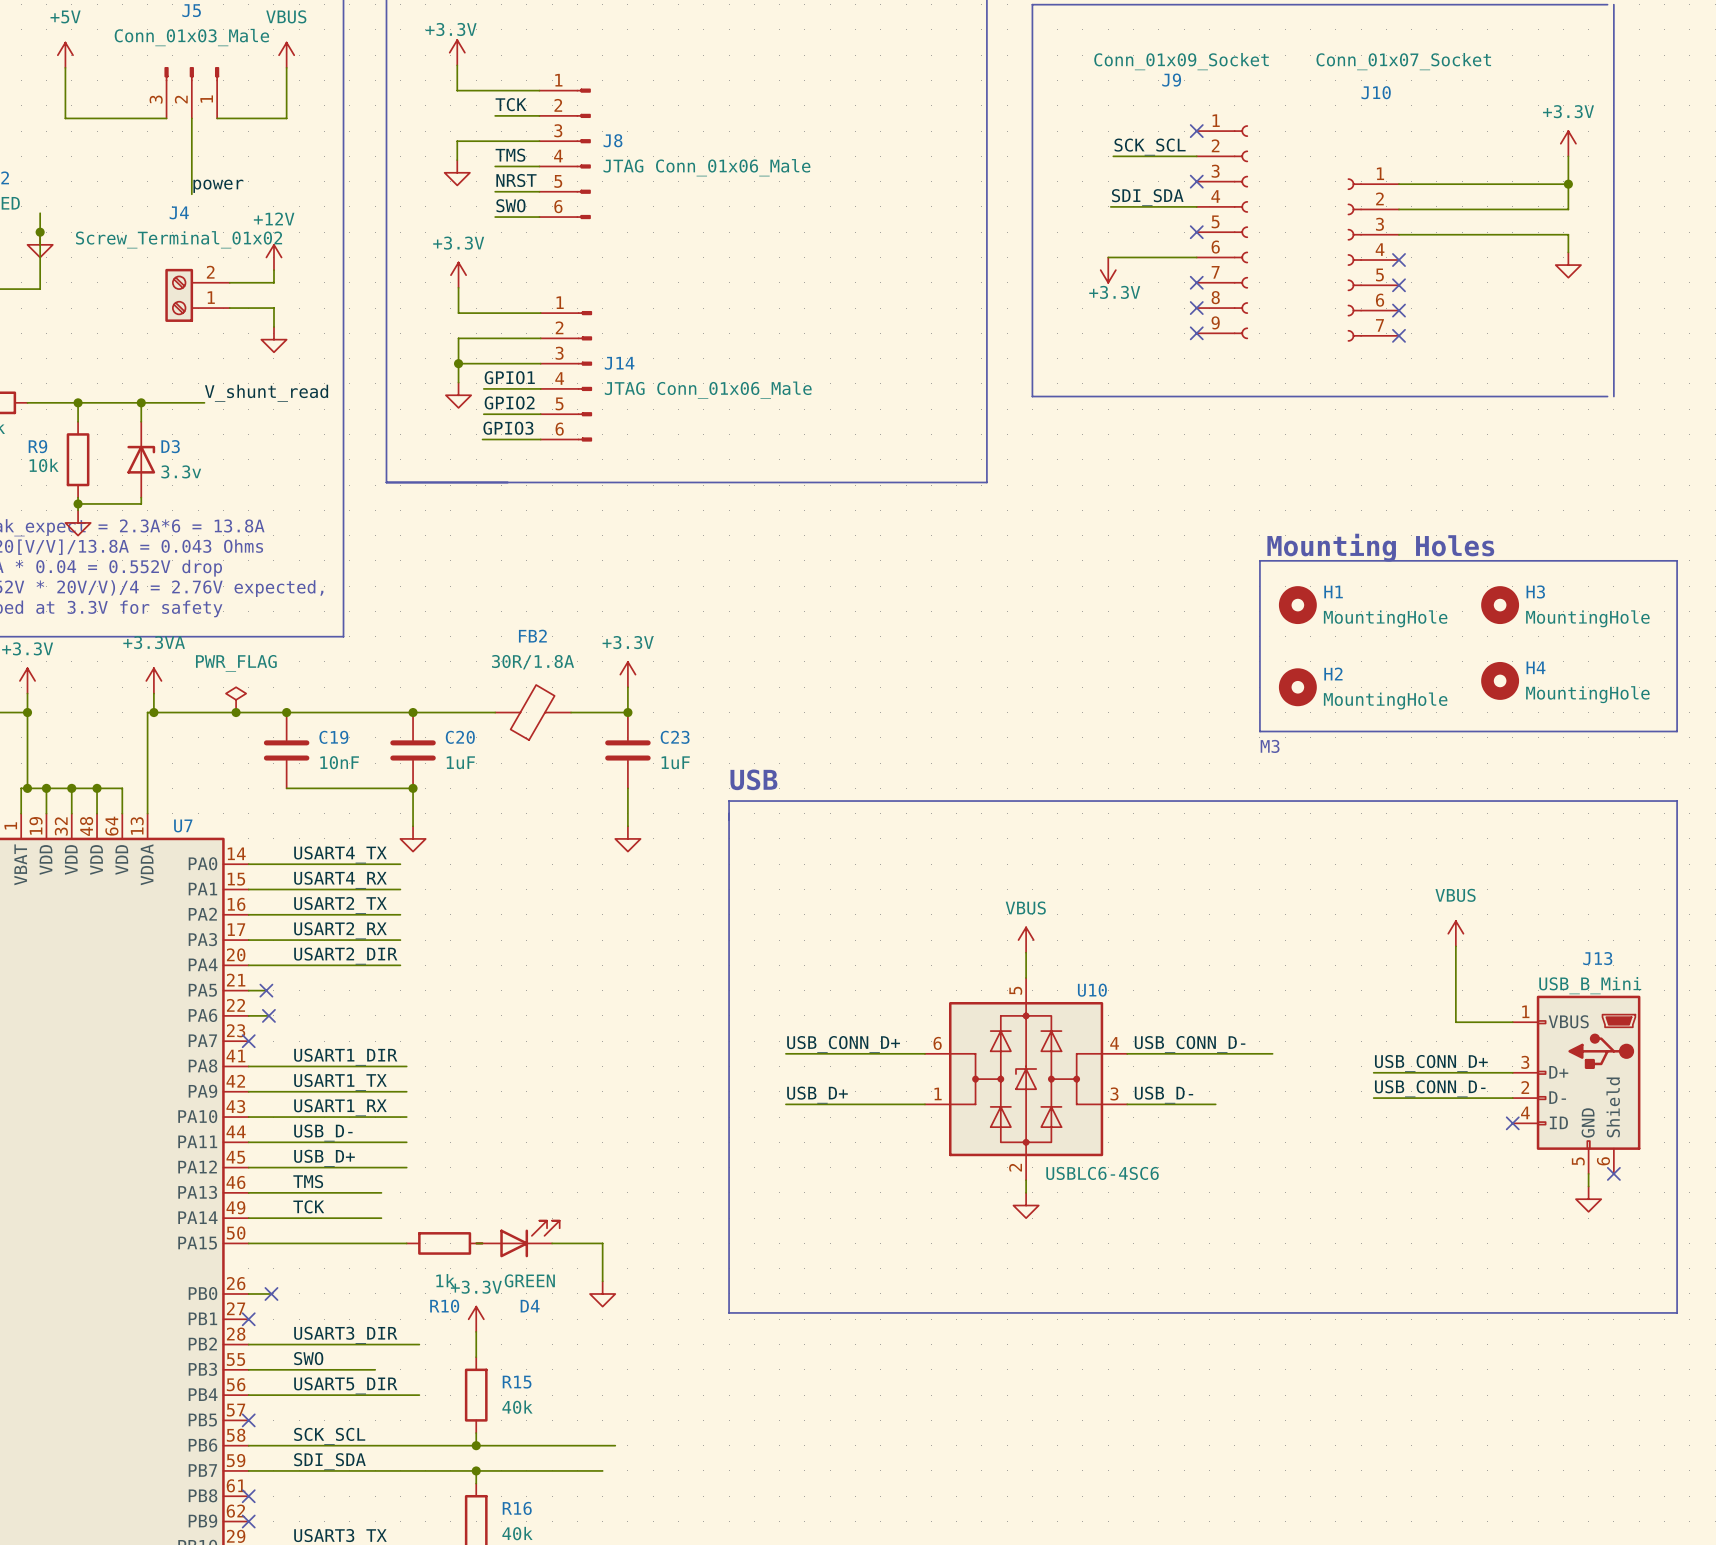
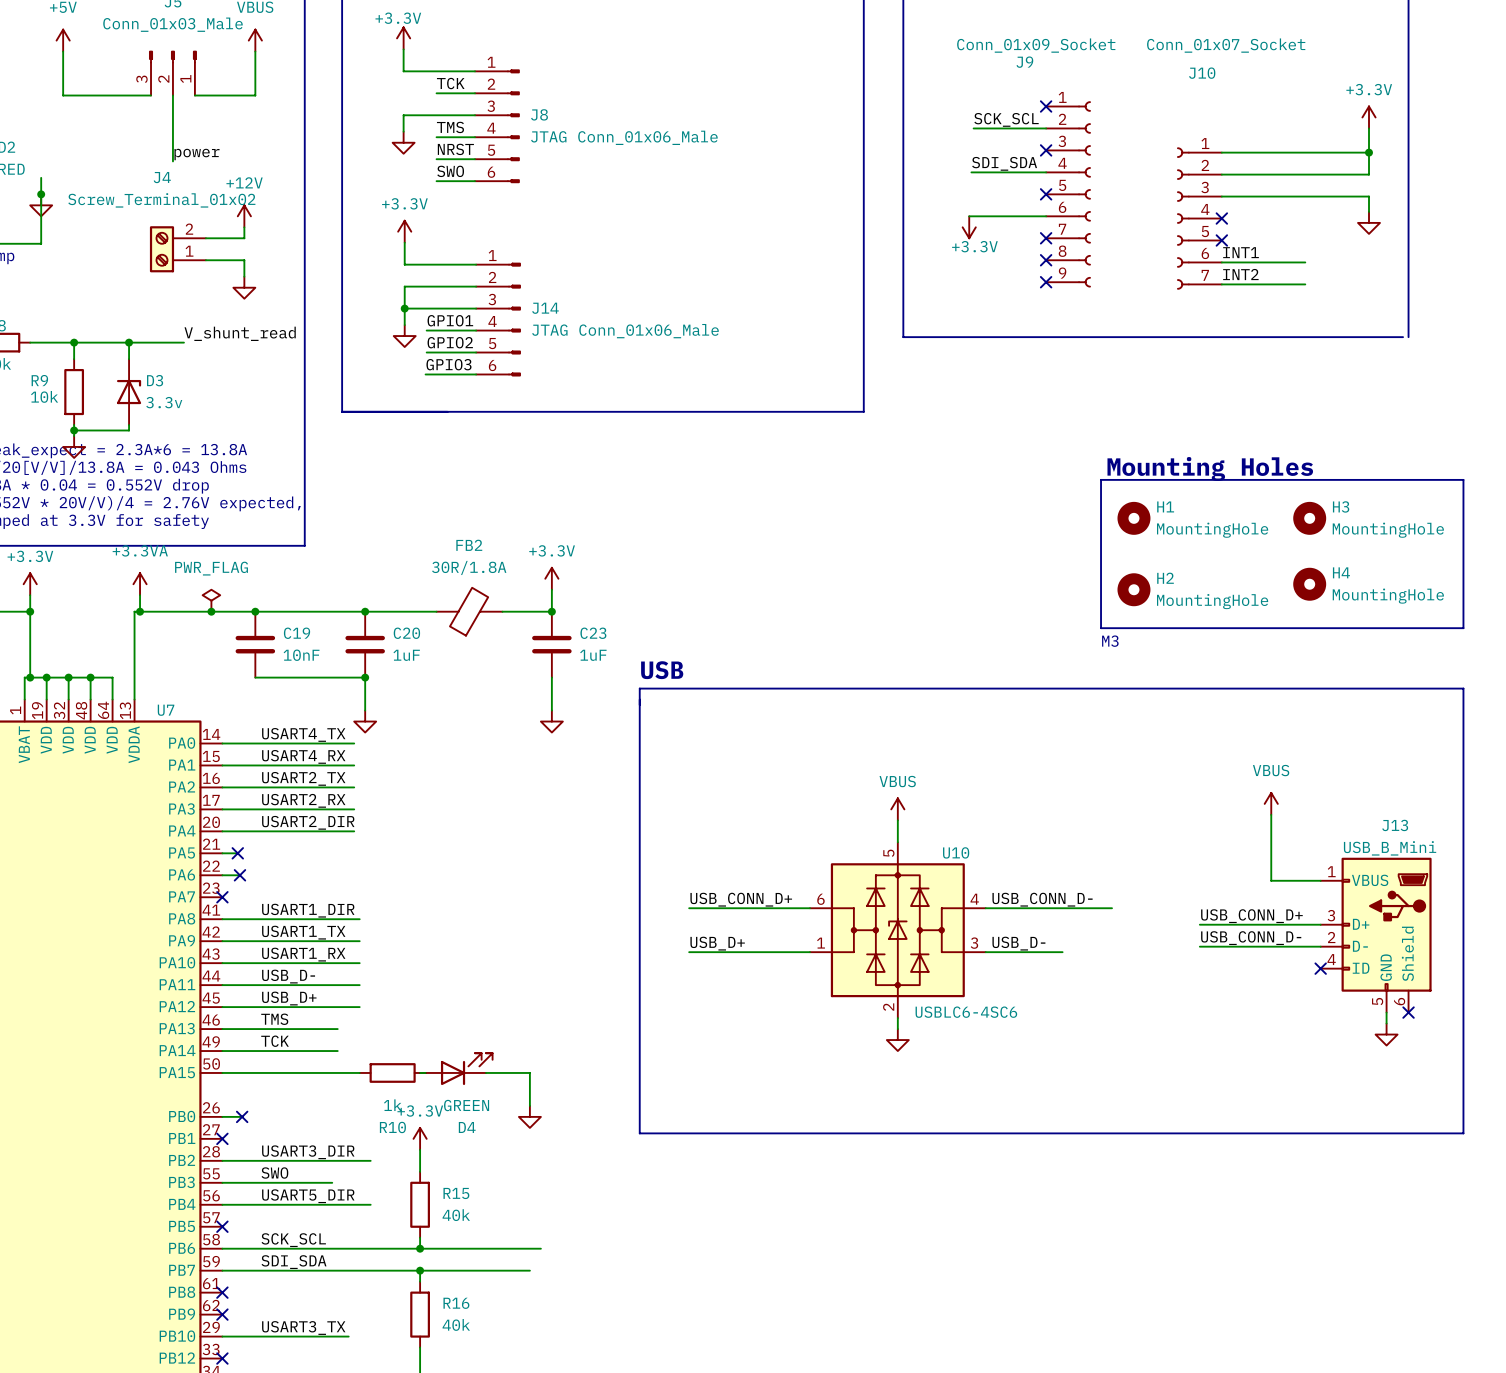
label: none -> INT1 (1241, 252)
wire: none -> (1221, 262) (1305, 262)
no-connect mark: (1398, 310) -> none
label: none -> INT2 (1240, 274)
wire: none -> (1221, 284) (1305, 284)
no-connect mark: (1398, 335) -> none

